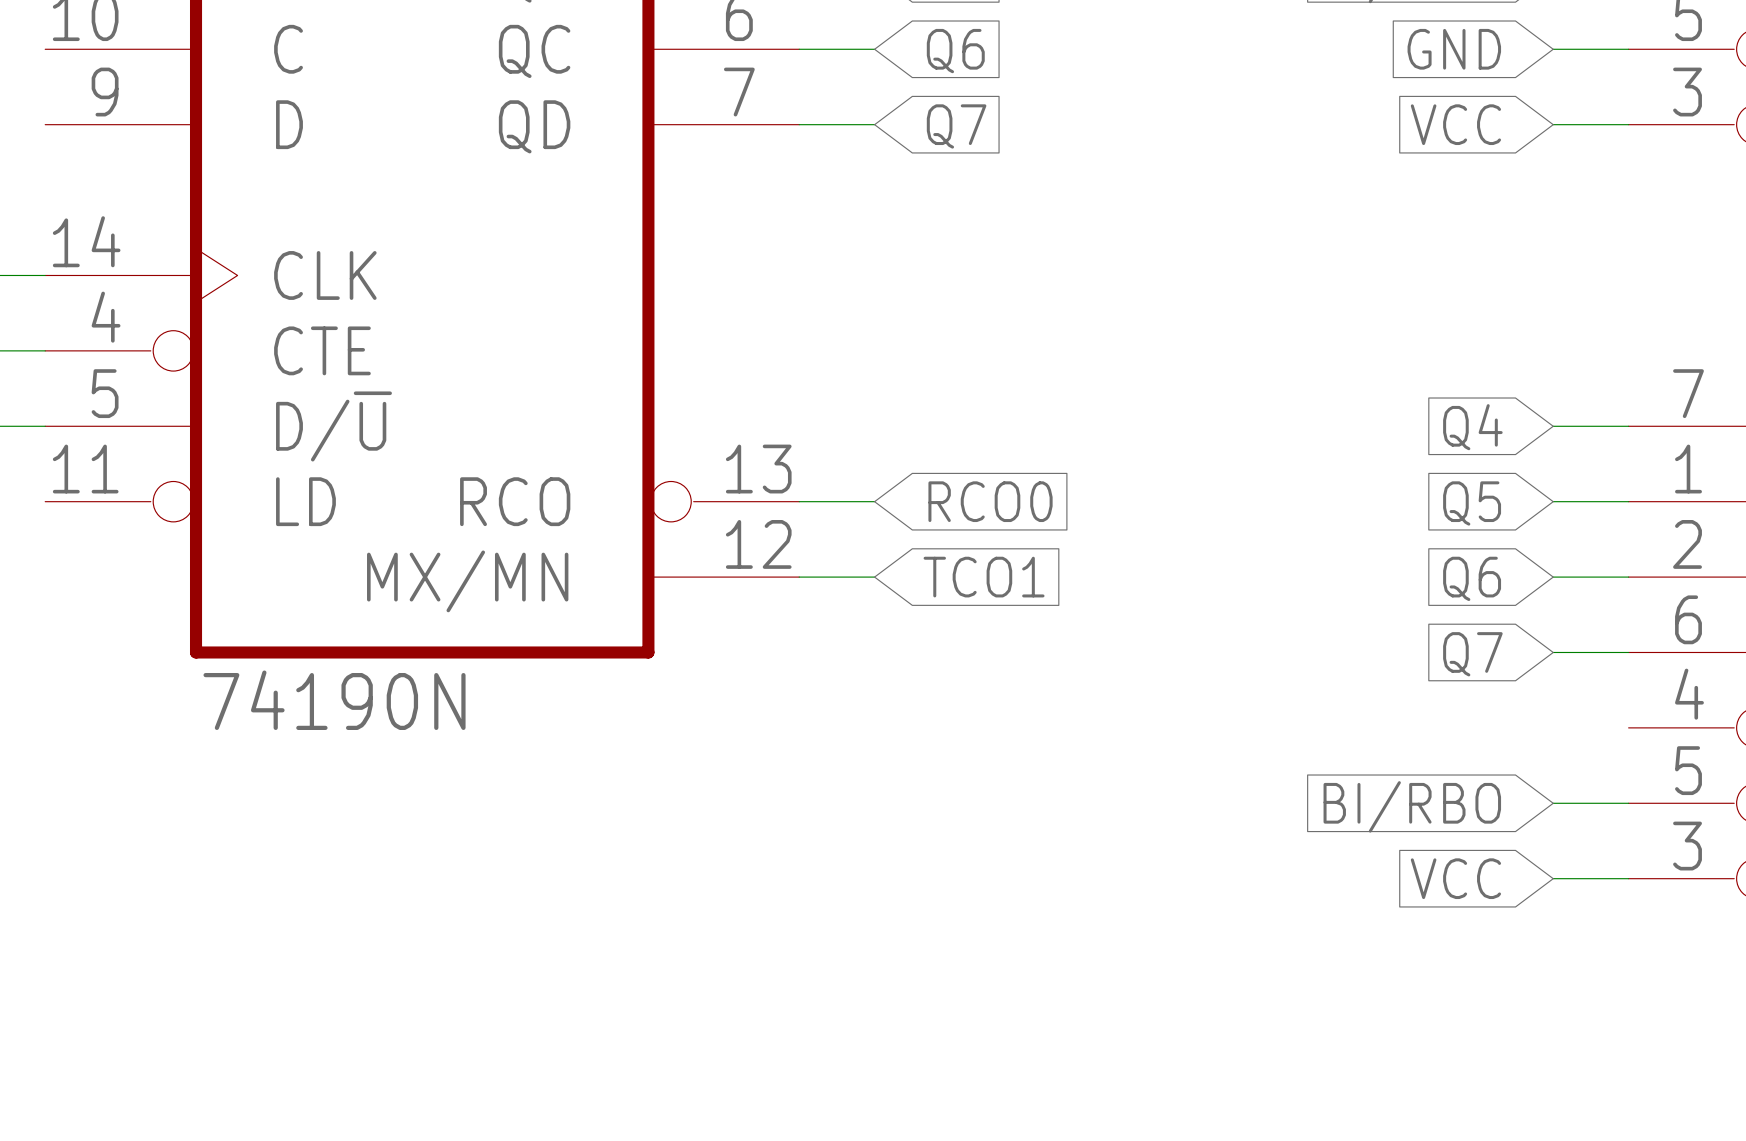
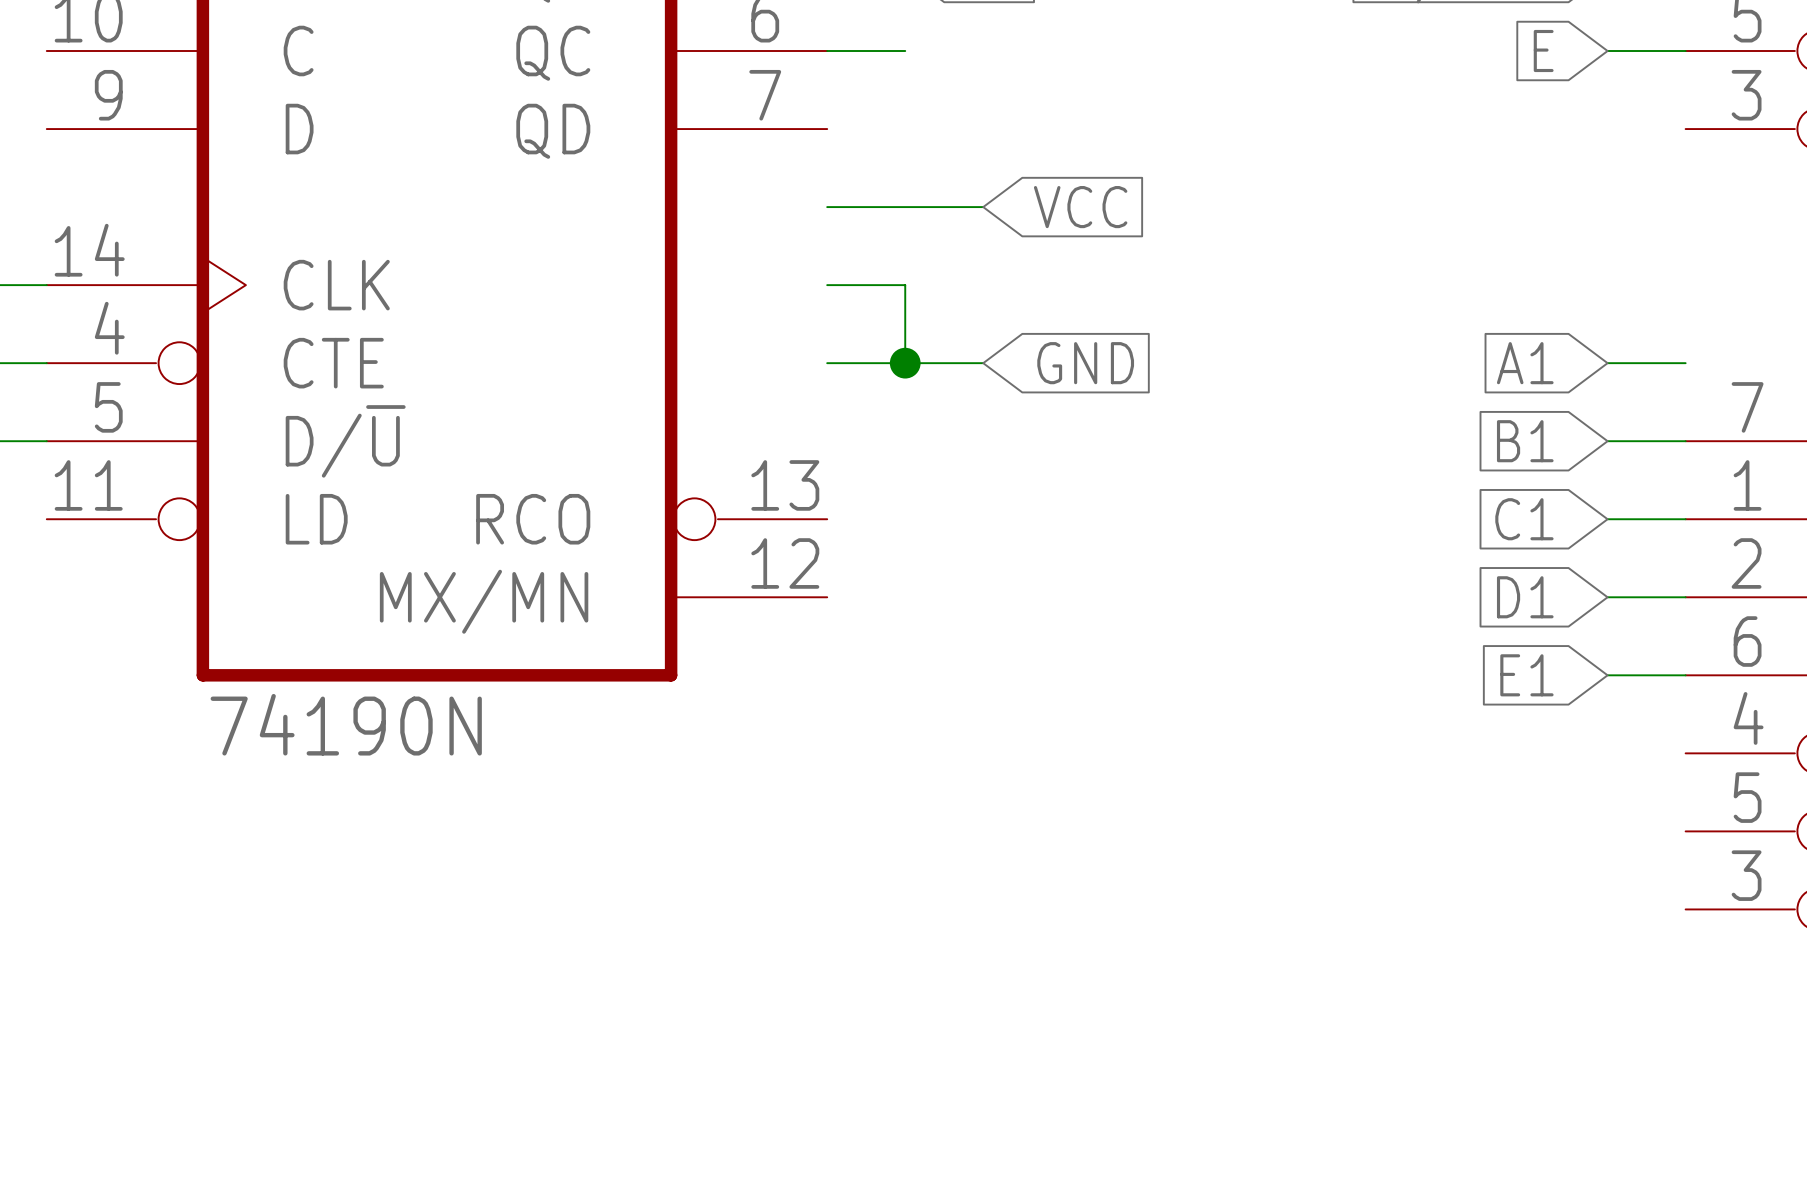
global label: GND (1454, 49) -> E (1543, 51)
global label: Q6 (955, 51) -> none
wire: (799, 124) (874, 124) -> none
global label: VCC (1455, 124) -> none
wire: (1553, 124) (1628, 124) -> none
global label: Q7 (956, 126) -> none
wire: none -> (827, 207) (983, 207)
global label: none -> VCC (1080, 207)
wire: none -> (827, 285) (905, 285) (905, 363)
wire: none -> (827, 363) (983, 363)
junction: none -> (905, 363)
global label: none -> GND (1085, 363)
global label: none -> A1 (1525, 363)
global label: Q4 (1472, 427) -> B1 (1525, 441)
wire: (799, 501) (874, 501) -> none
global label: RCO0 (990, 501) -> none
global label: Q5 (1472, 503) -> C1 (1524, 519)
wire: (799, 577) (874, 577) -> none
global label: TCO1 (984, 577) -> none
global label: Q6 (1472, 578) -> D1 (1525, 597)
global label: Q7 (1472, 654) -> E1 (1526, 675)
wire: (1553, 803) (1628, 803) -> (1607, 363) (1685, 363)
global label: BI/RBO (1412, 806) -> none
global label: VCC (1455, 878) -> none
wire: (1553, 878) (1628, 878) -> none

